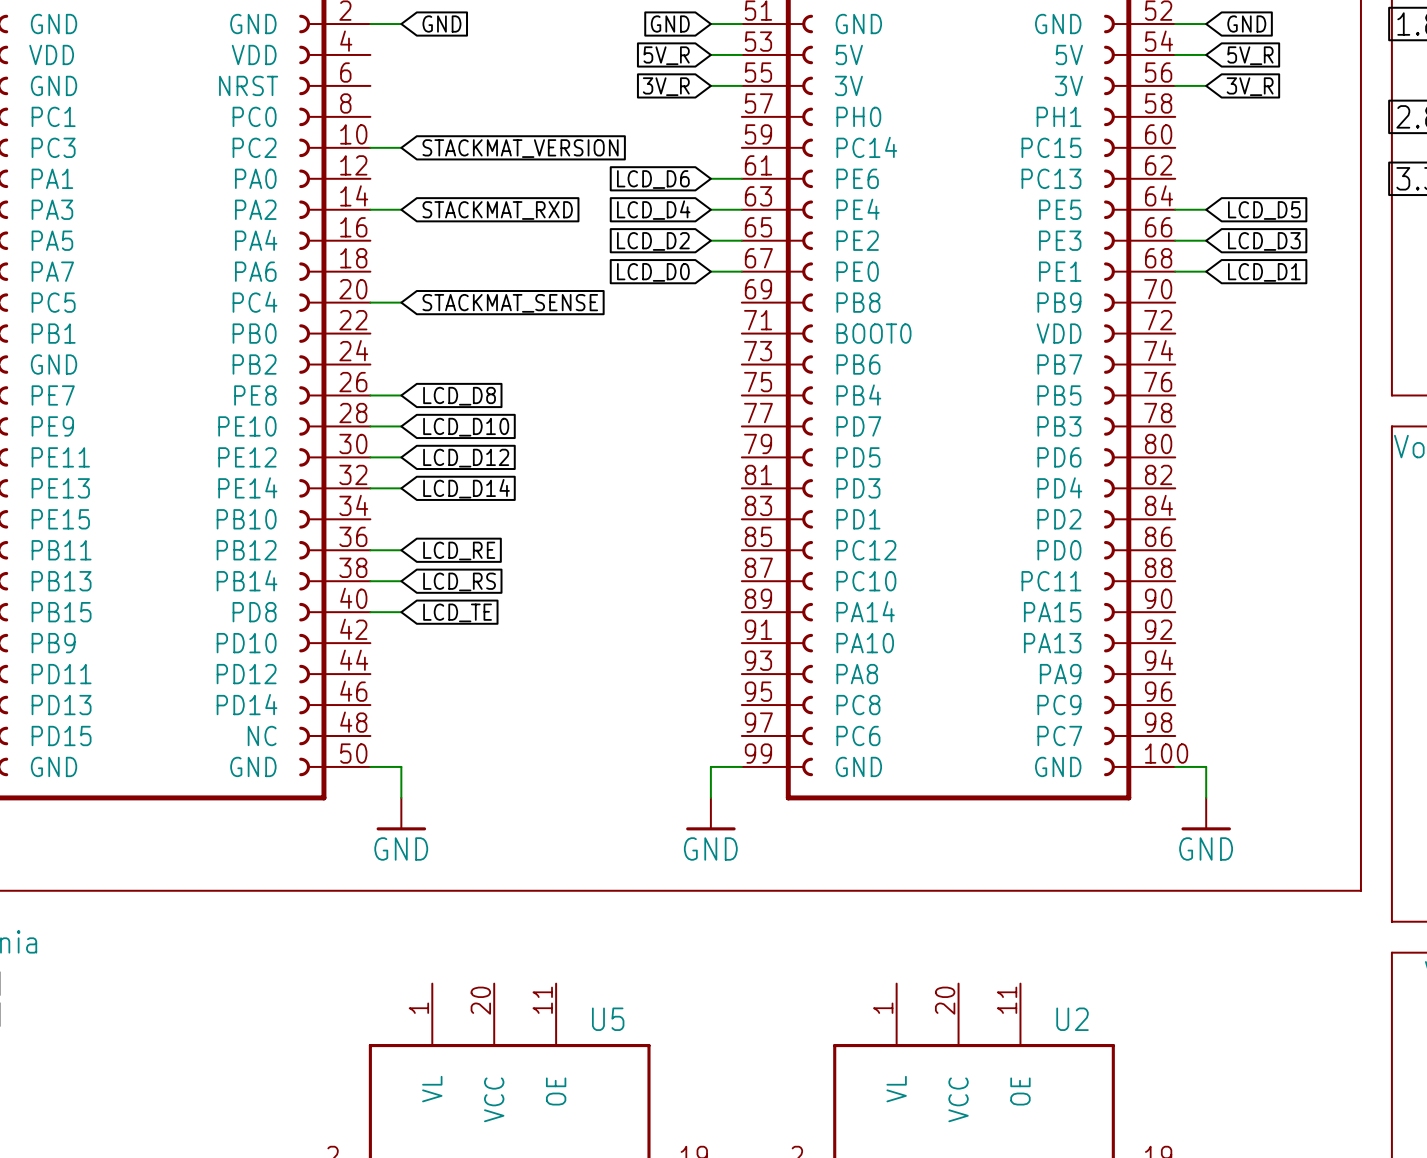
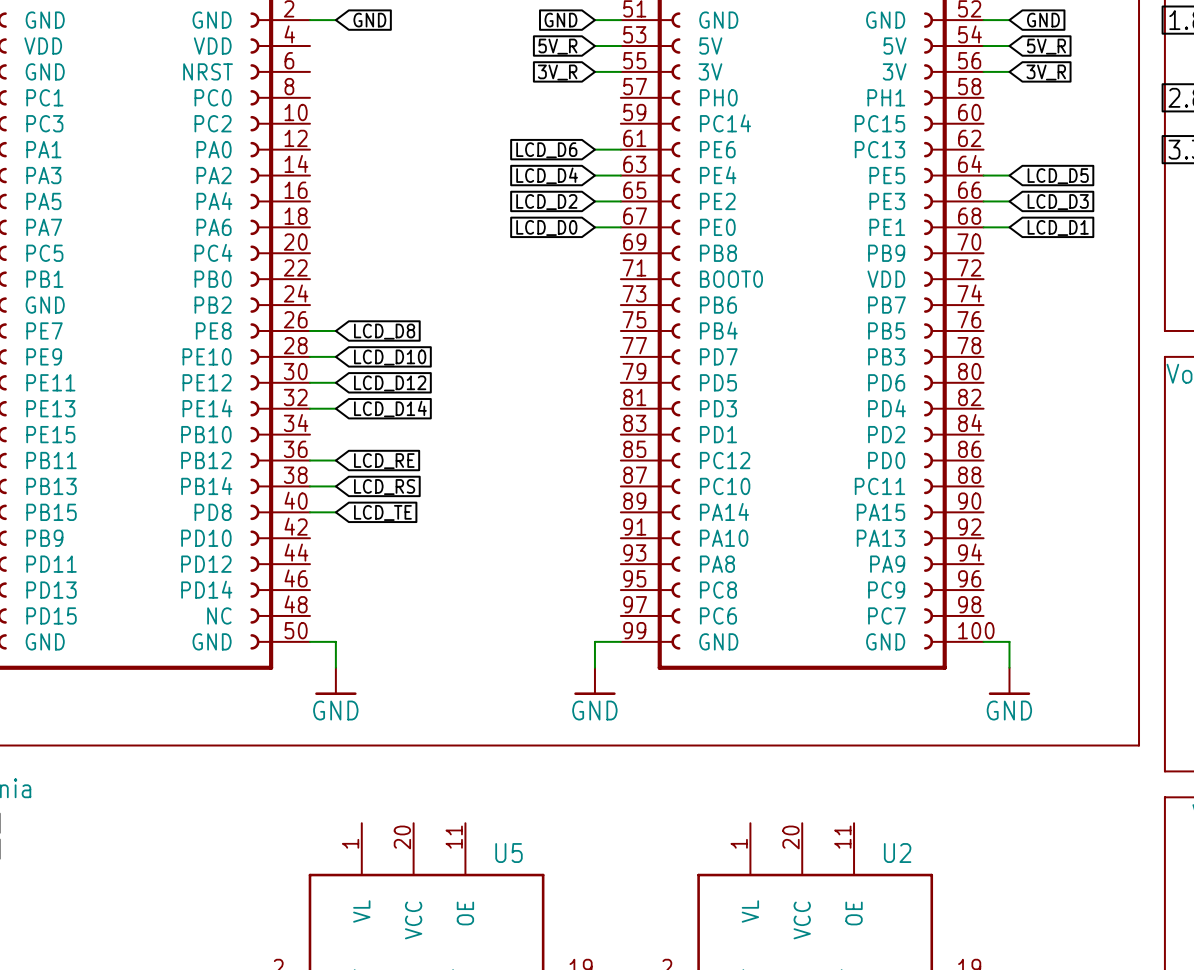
wire: (370, 147) (401, 147) -> none
global label: STACKMAT_VERSION (520, 148) -> none
wire: (370, 209) (401, 209) -> none
global label: STACKMAT_RXD (497, 210) -> none
wire: (370, 302) (401, 302) -> none
global label: STACKMAT_SENSE (510, 303) -> none

